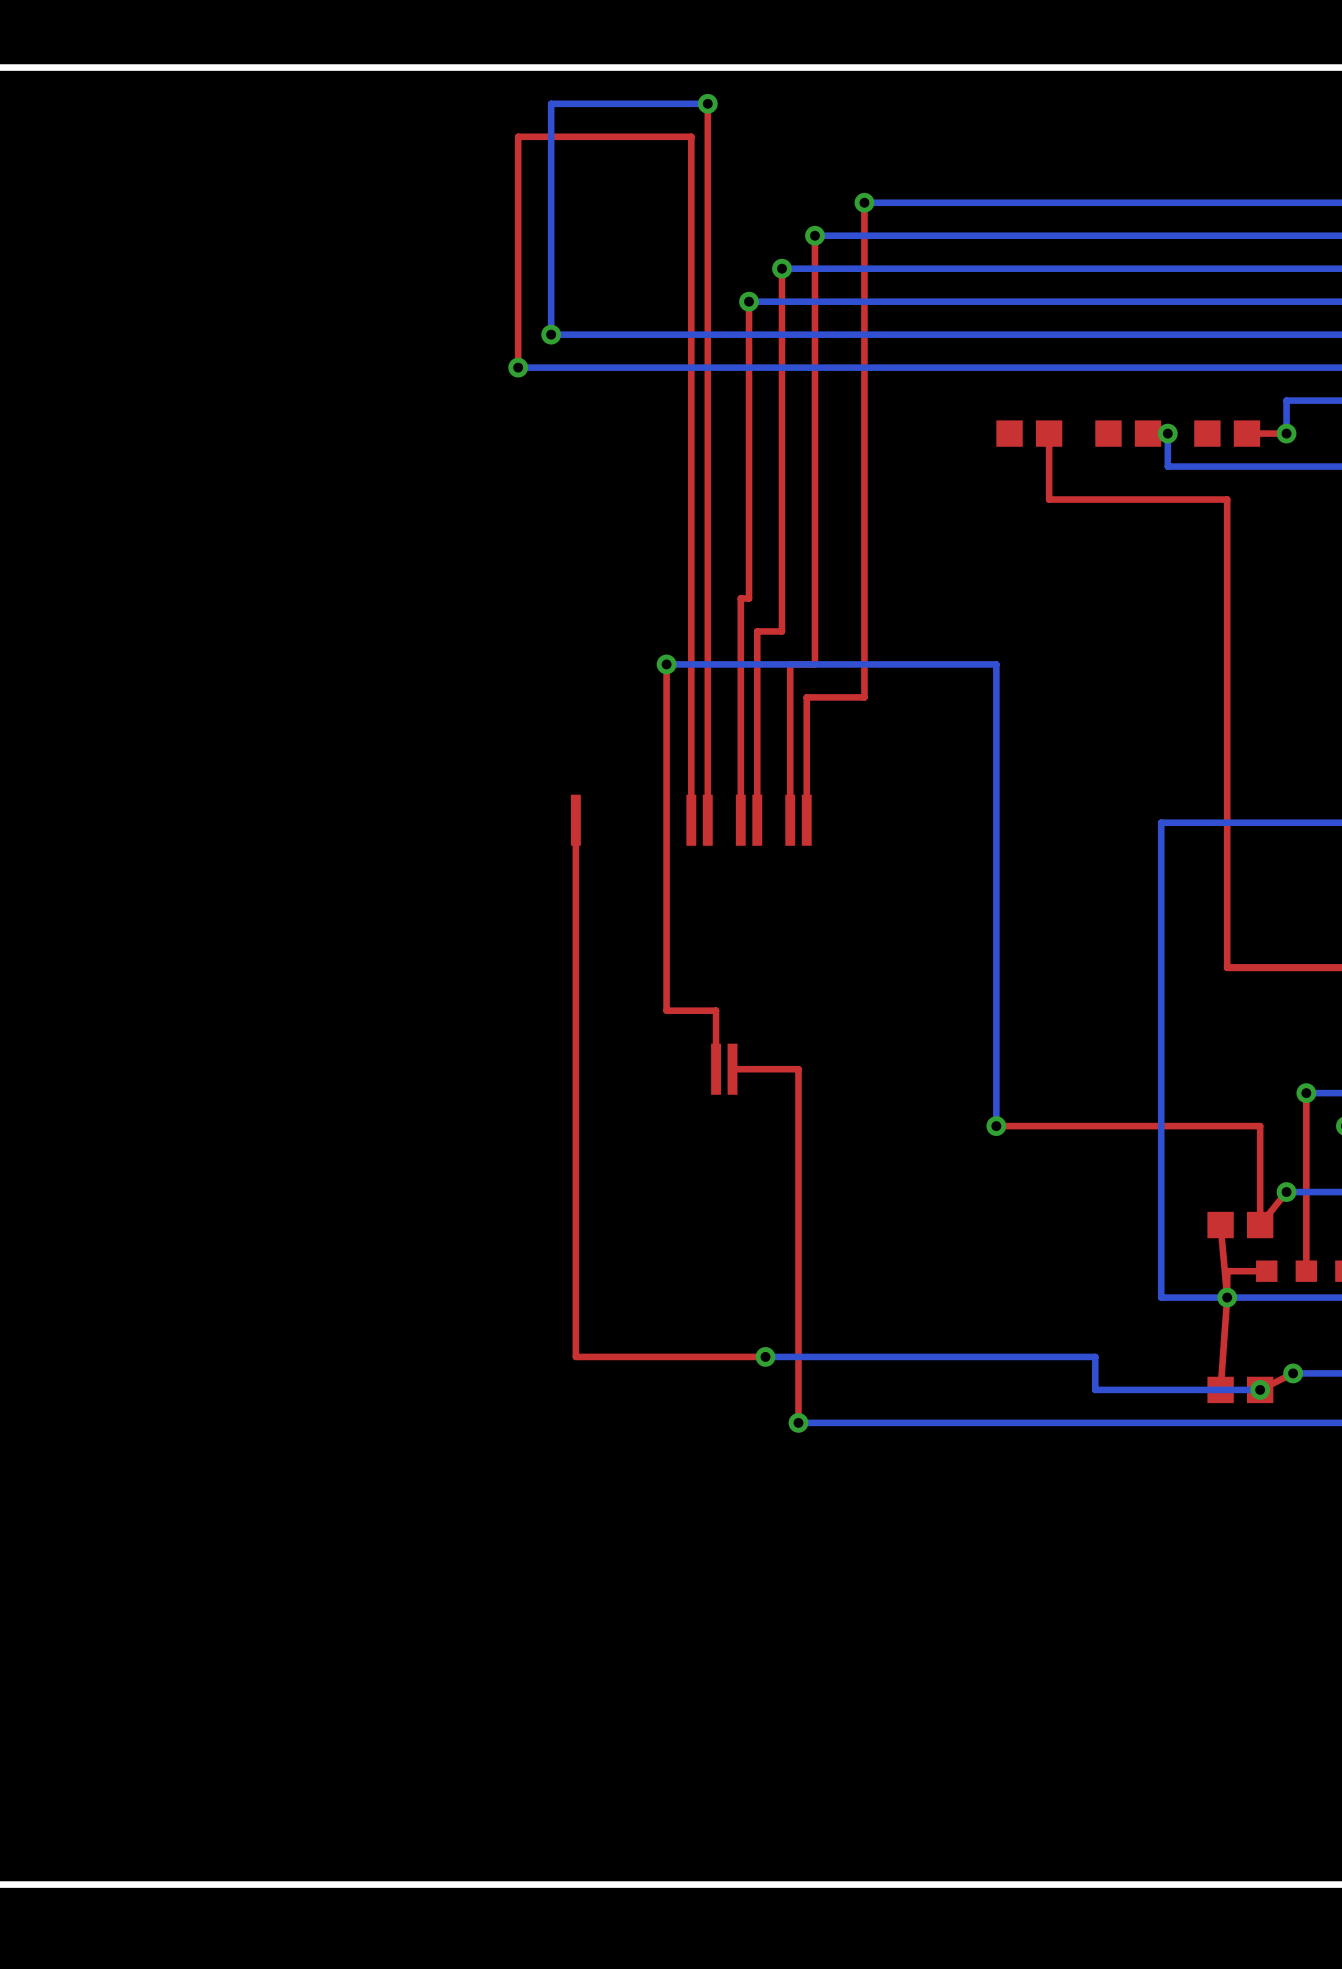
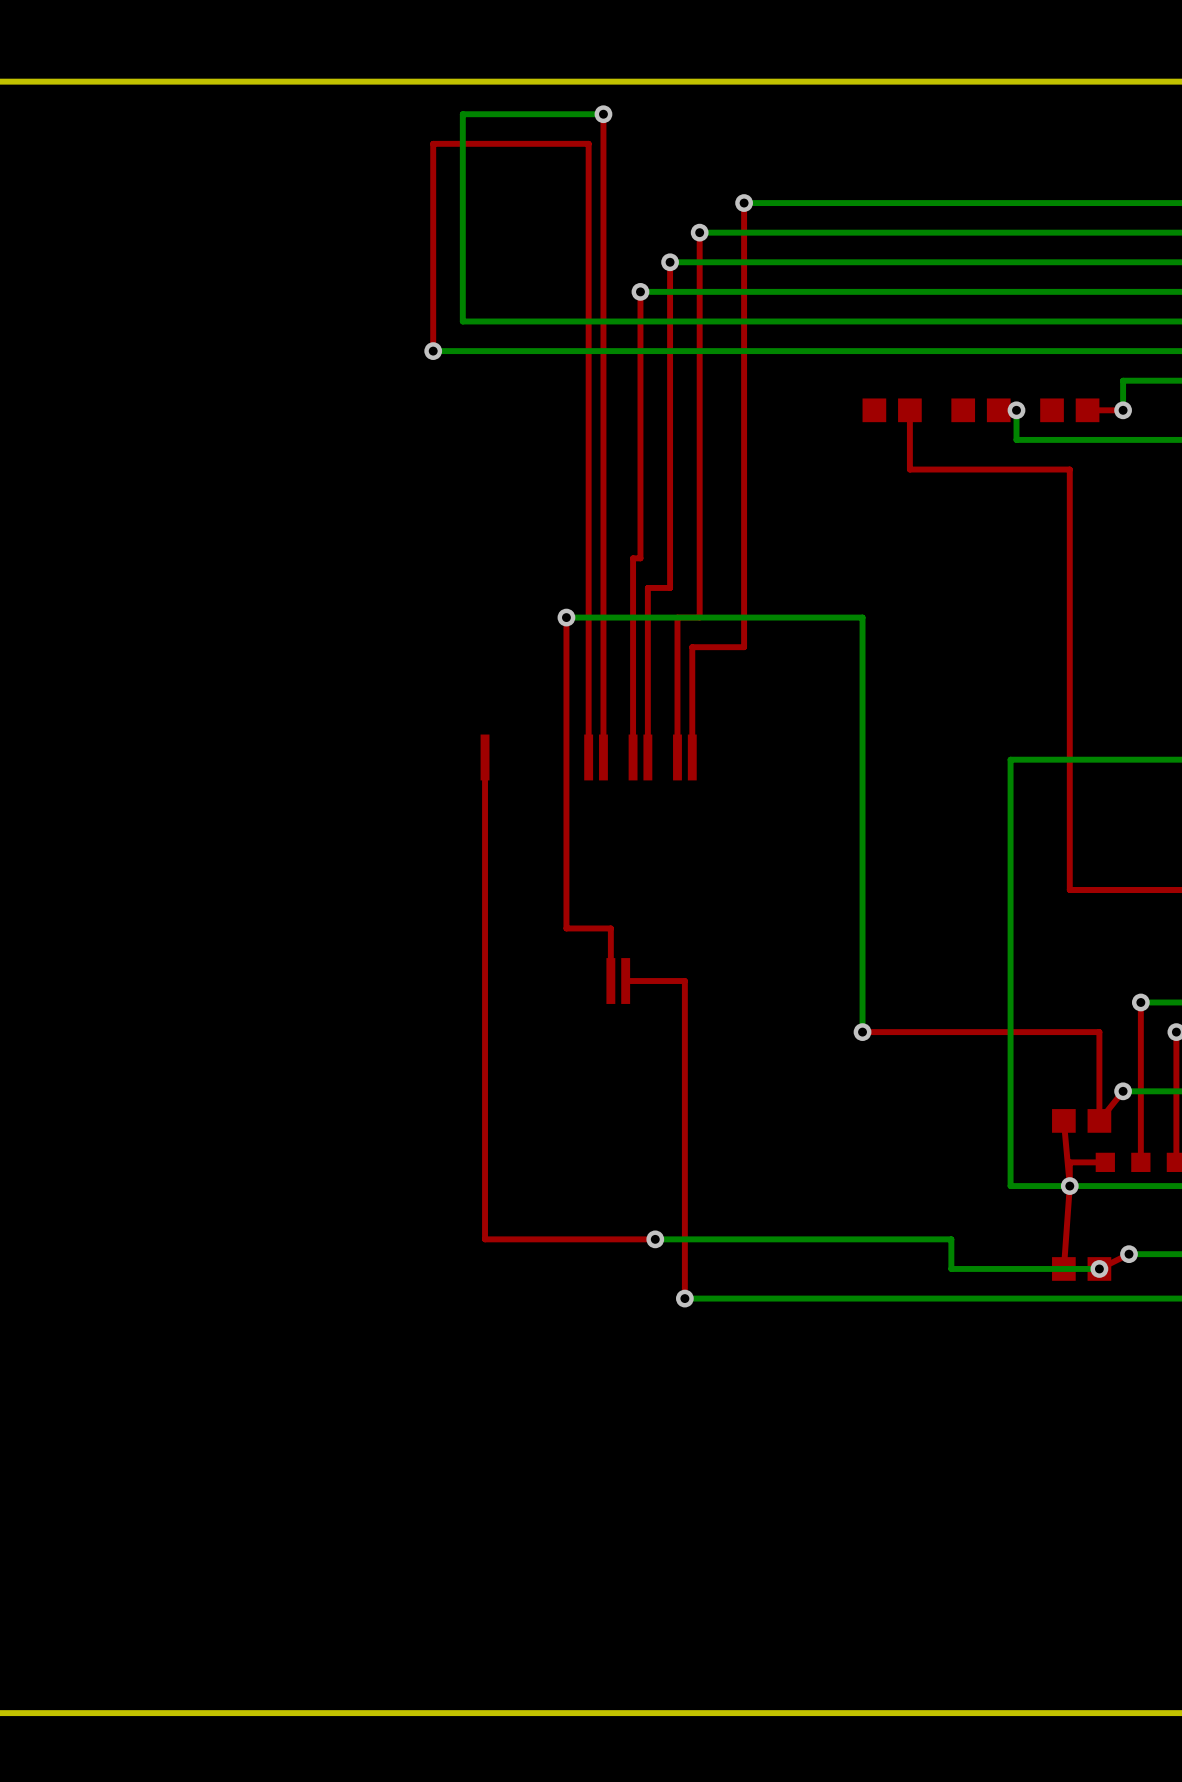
via: (551, 334) -> none

